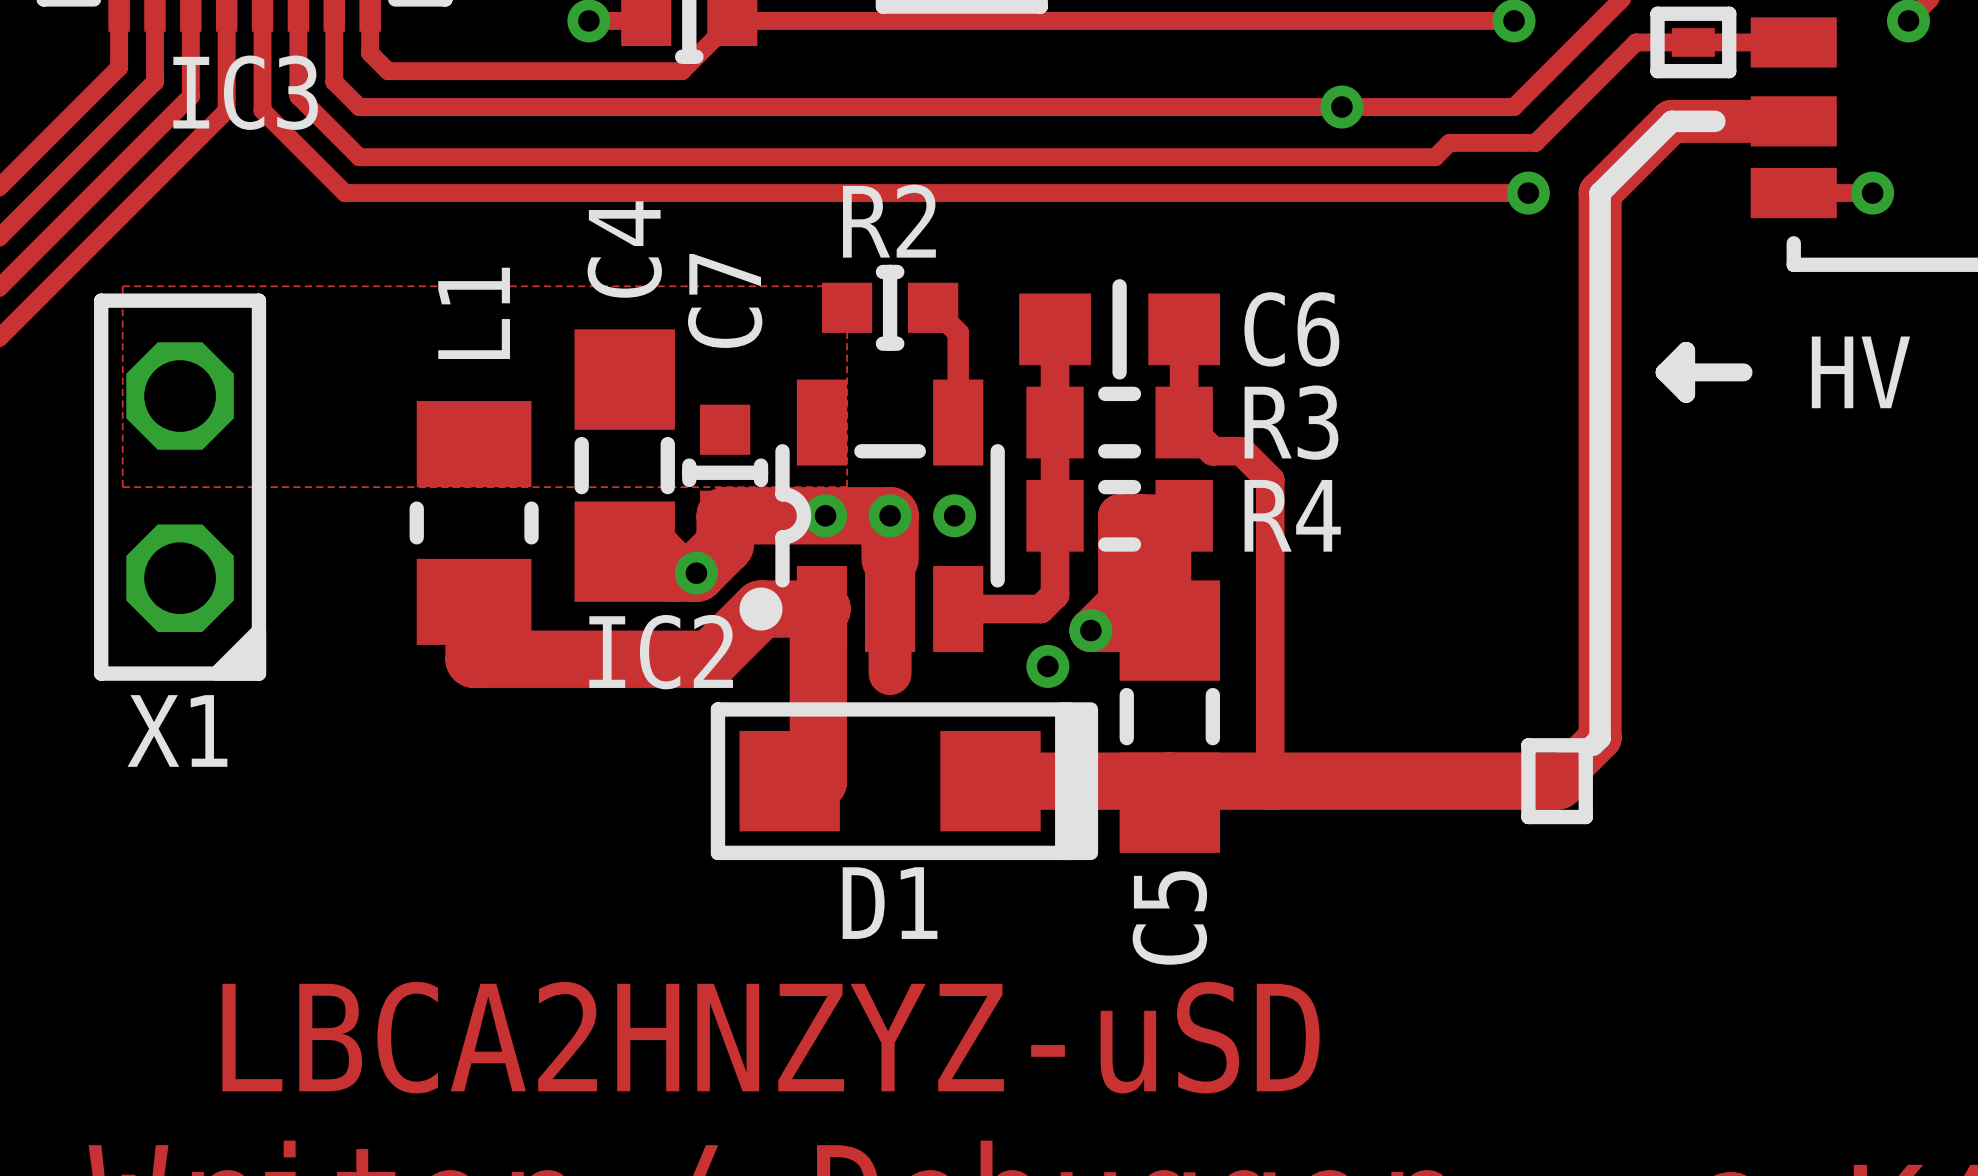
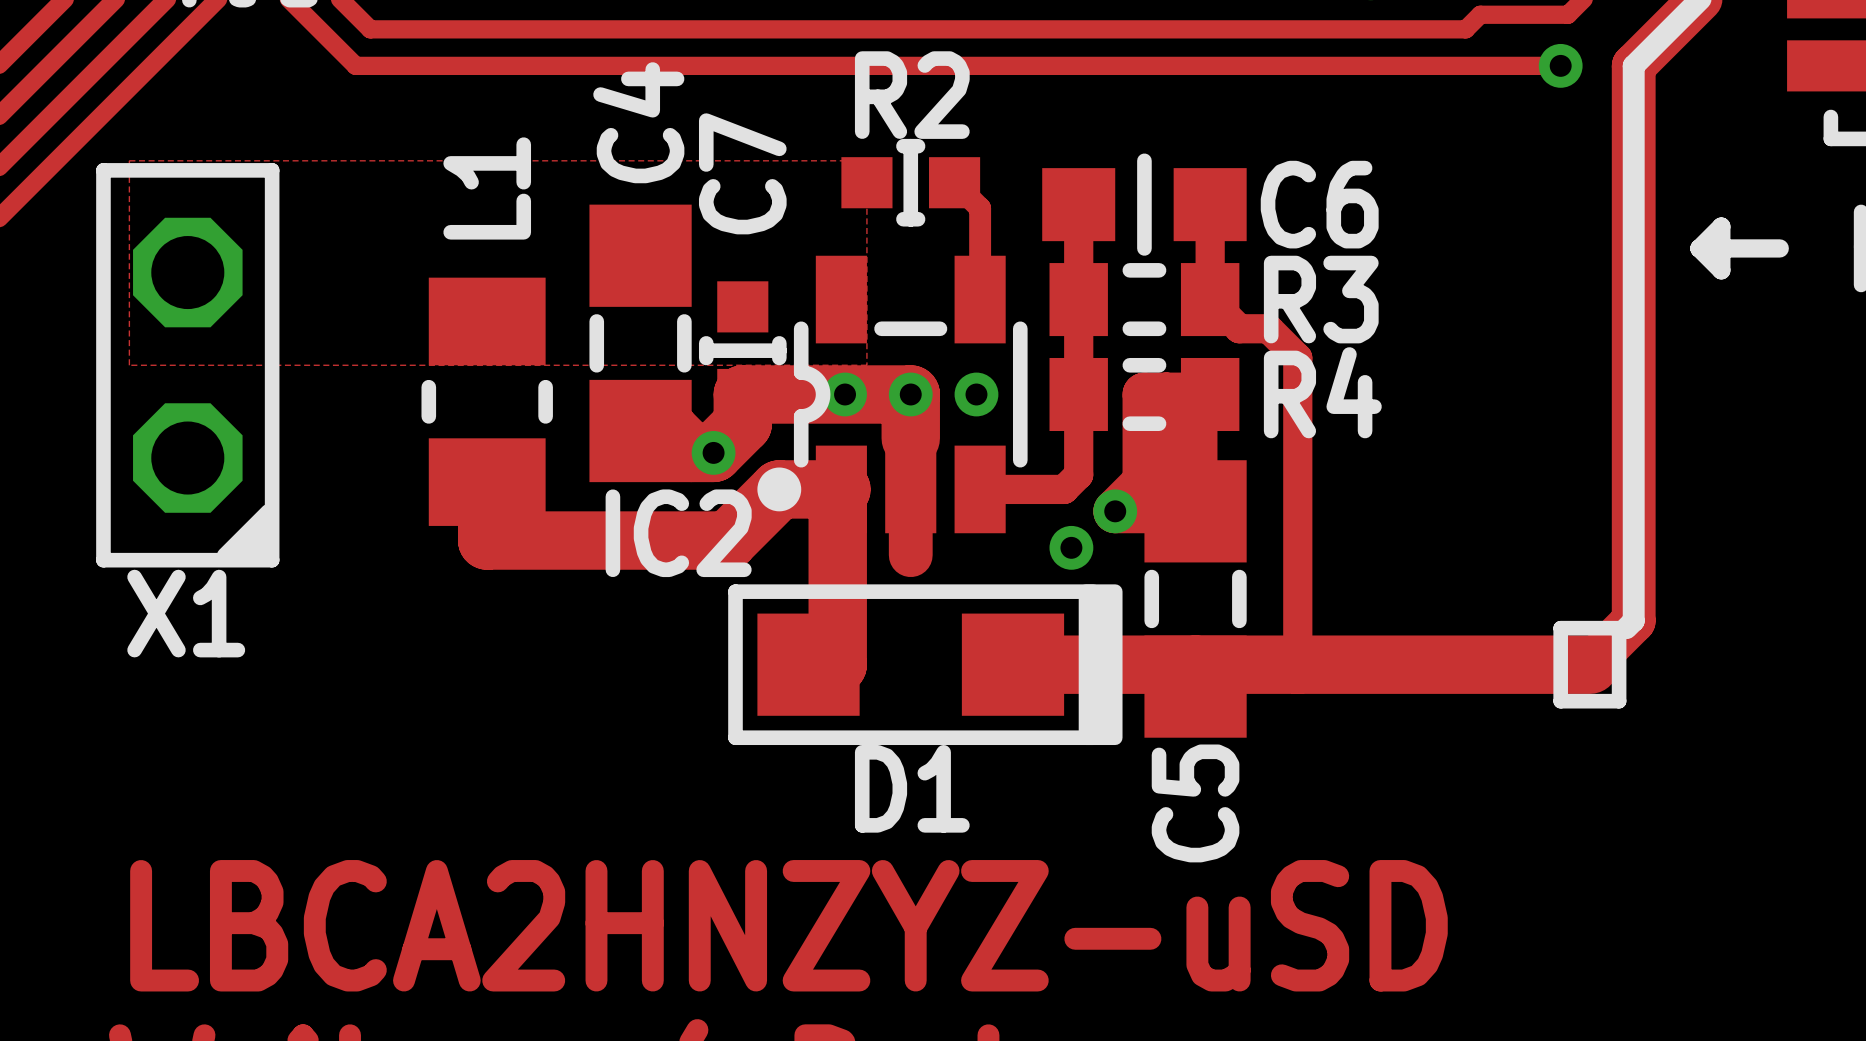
X1 footprint: [94, 293, 267, 681] -> [96, 163, 280, 568]

